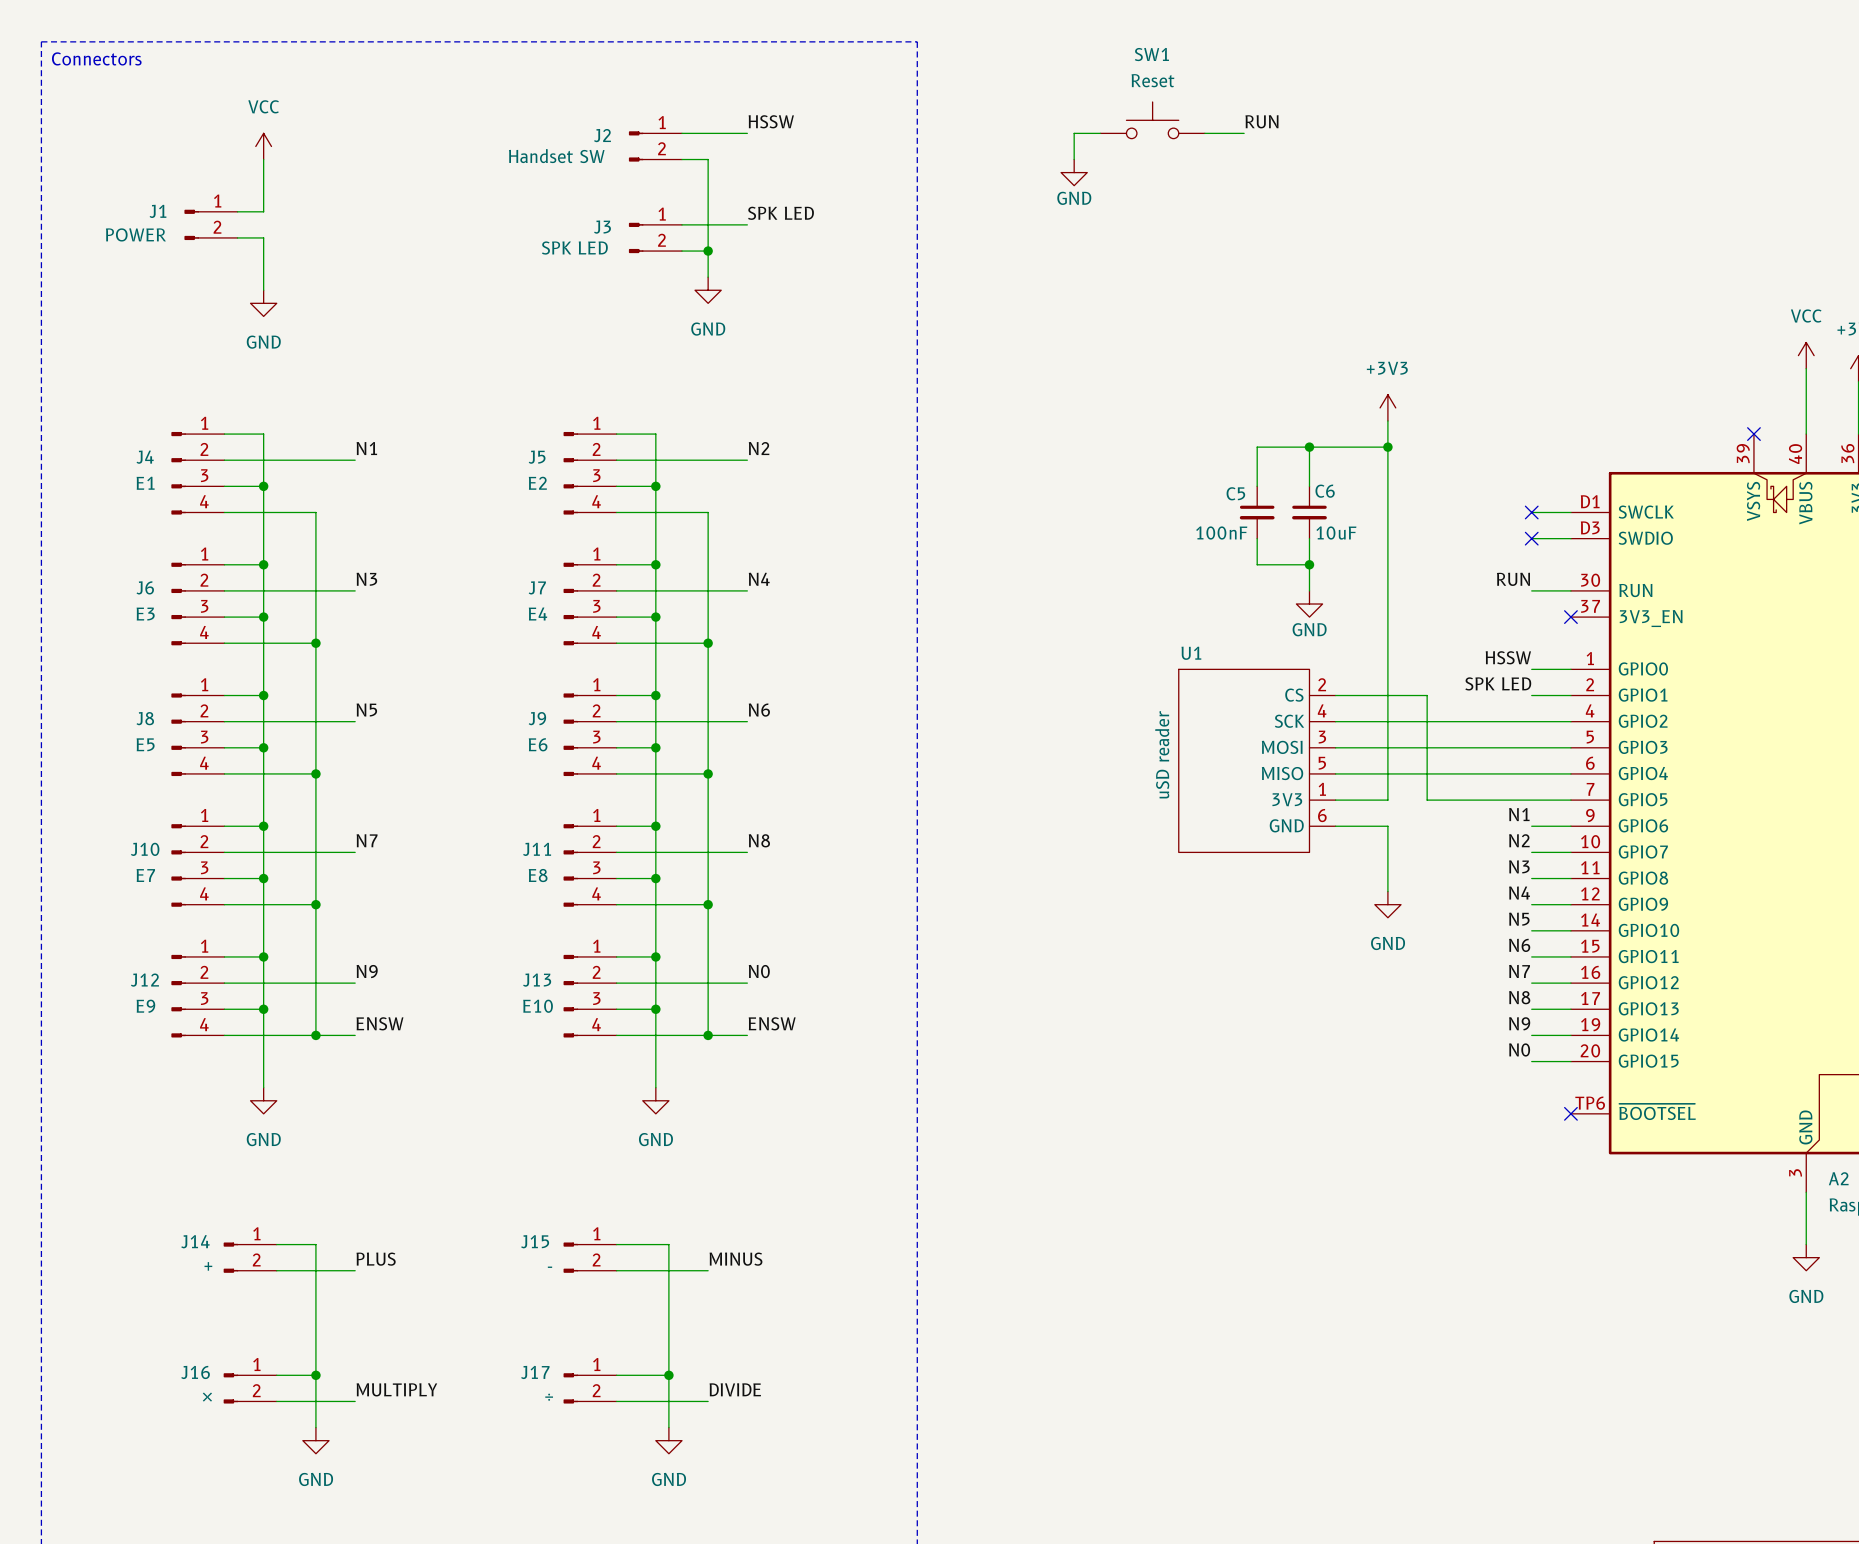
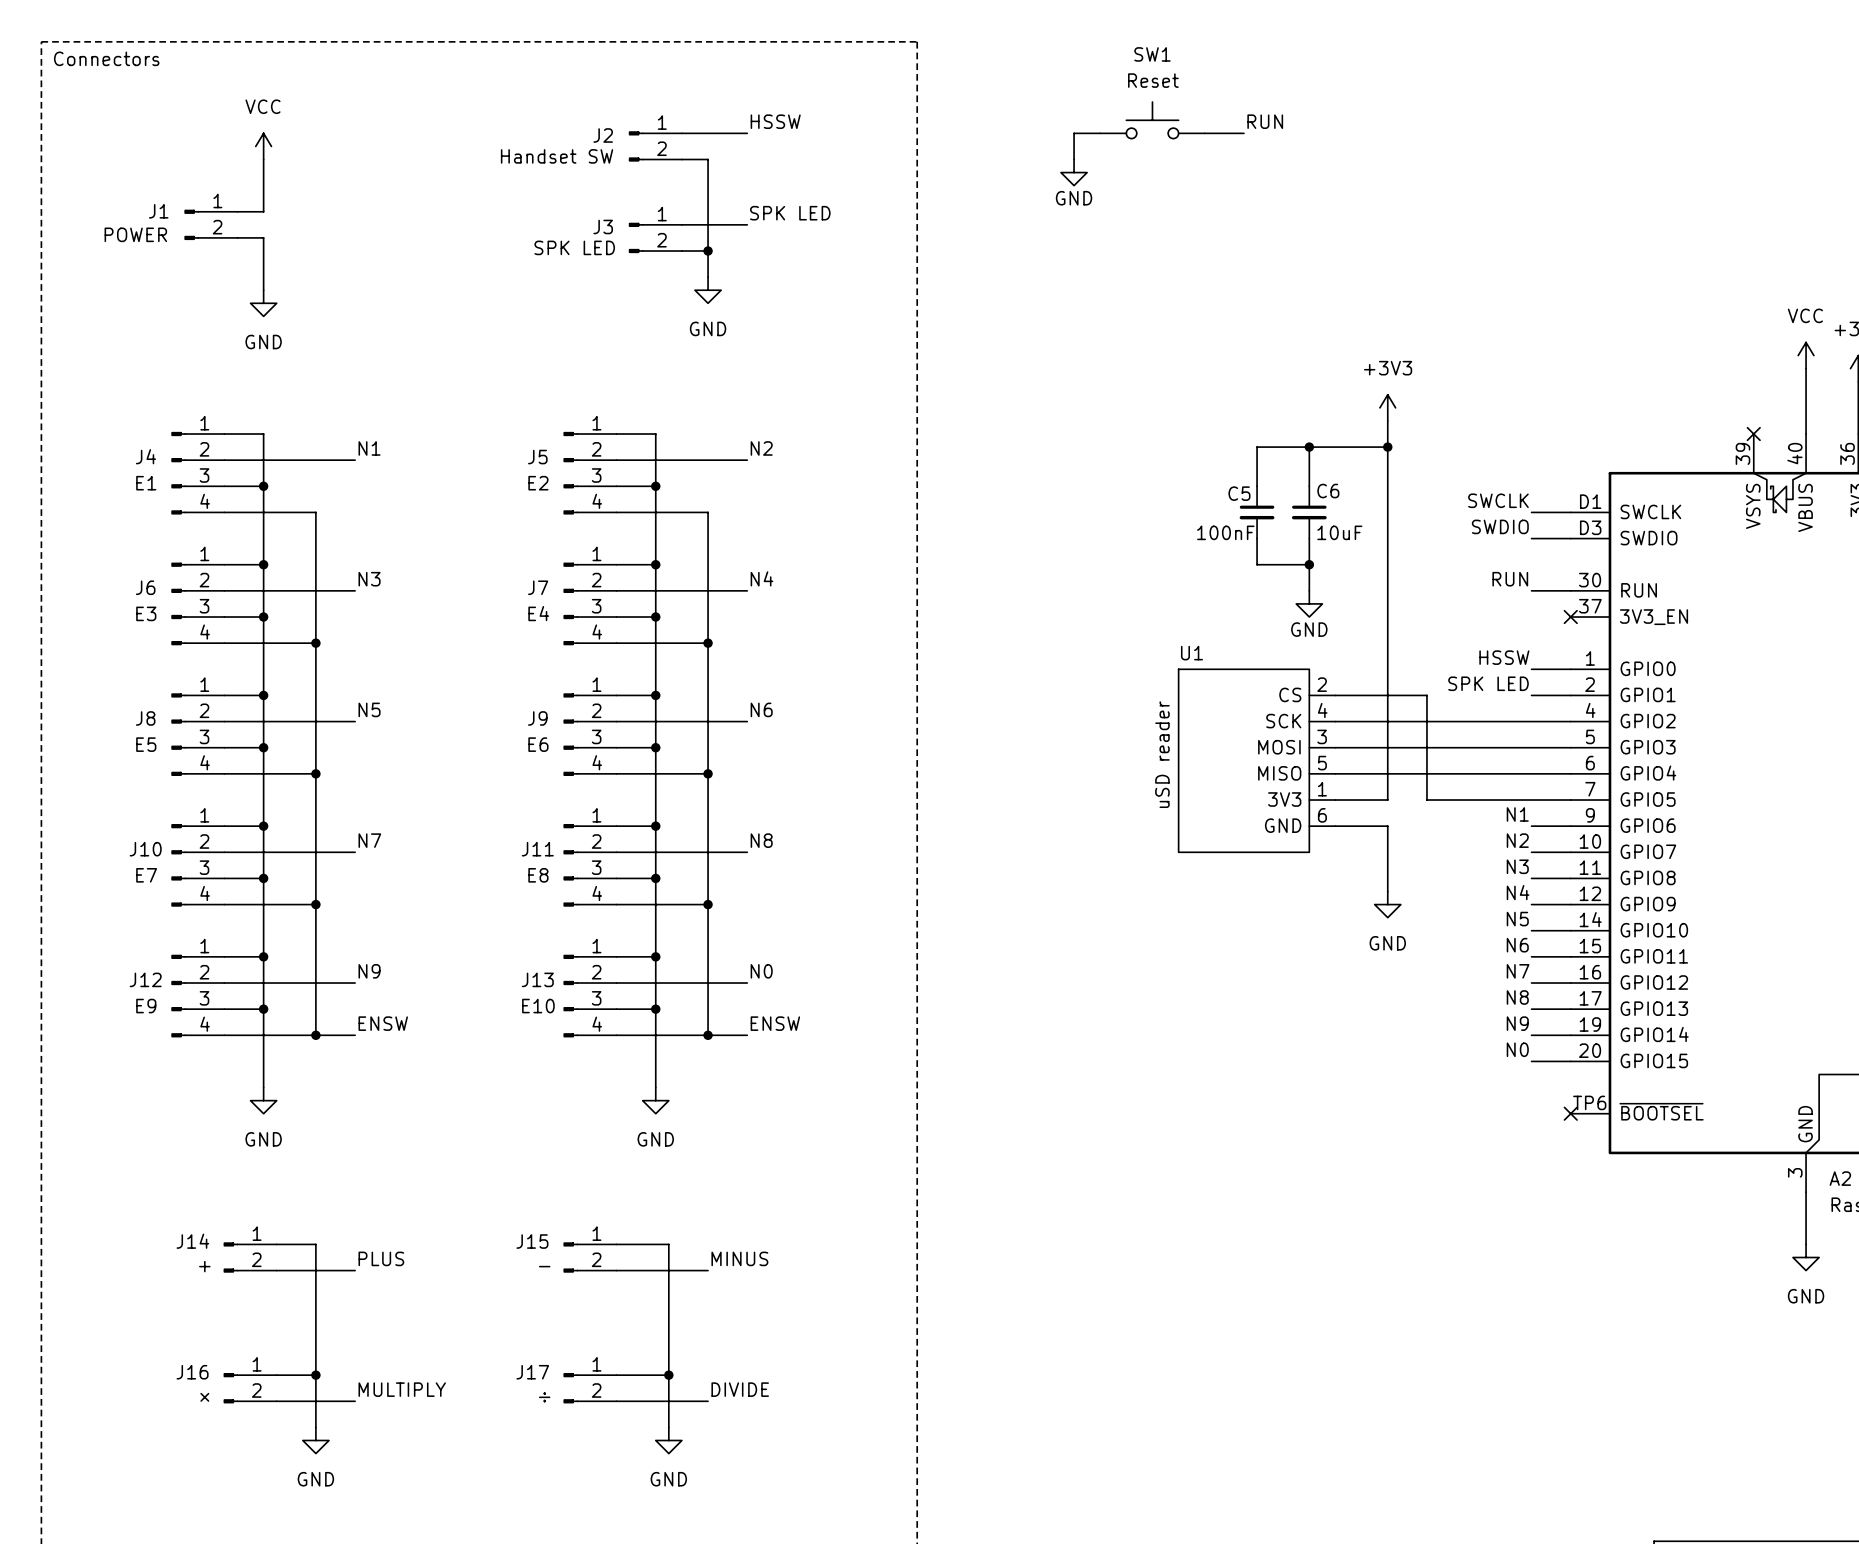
label: none -> SWCLK (1498, 500)
no-connect mark: (1531, 512) -> none
label: none -> SWDIO (1500, 526)
no-connect mark: (1531, 538) -> none

